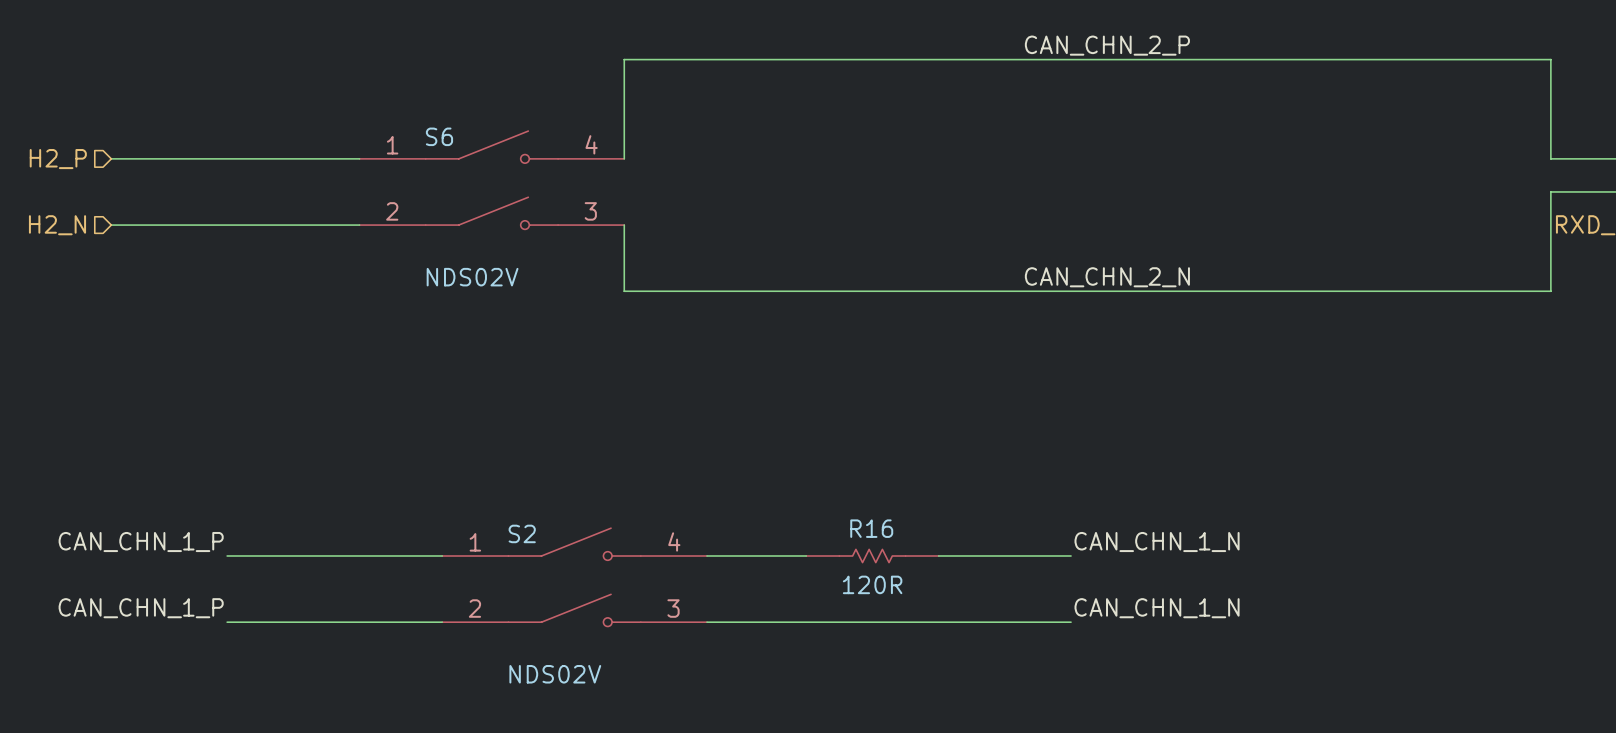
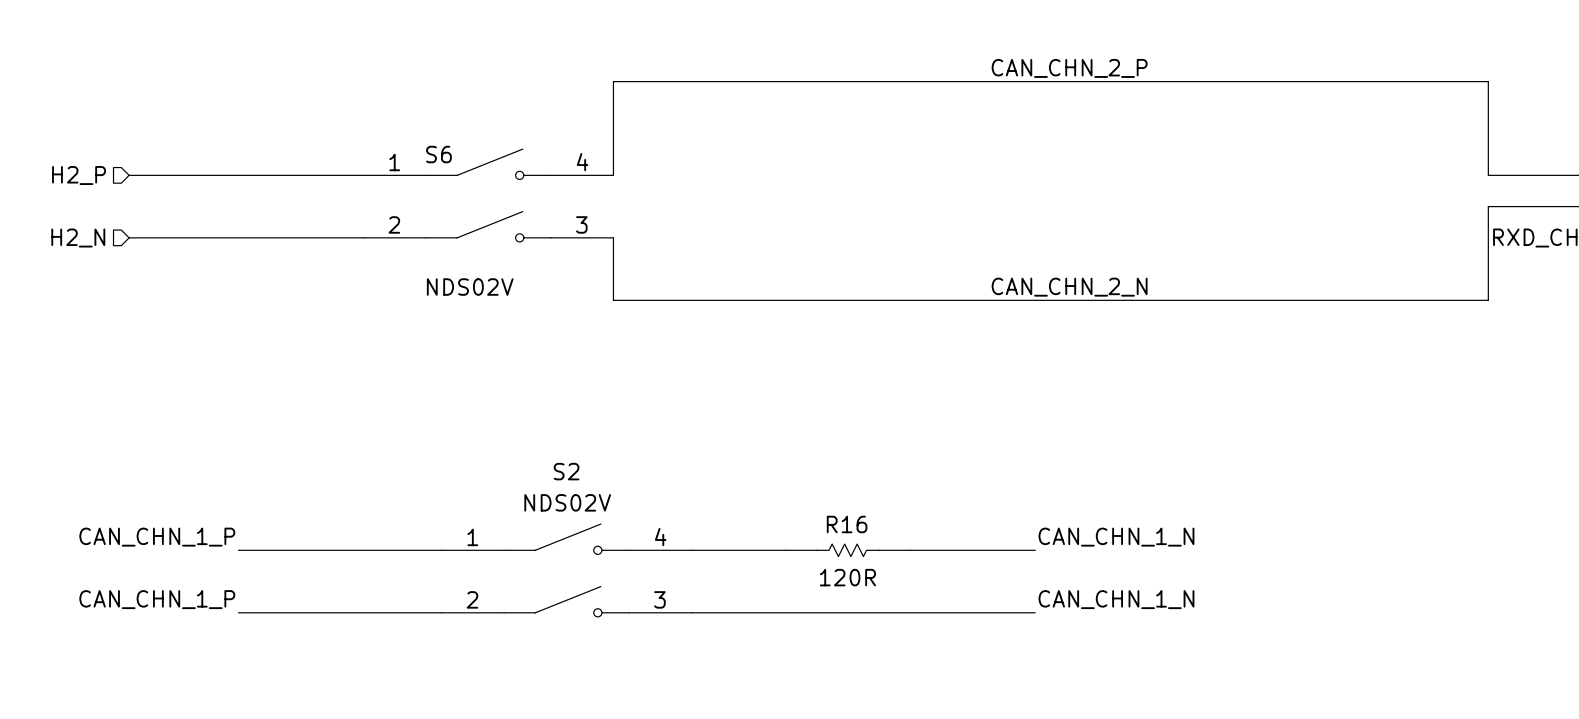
S2 name position: S2 (522, 533) -> S2 (566, 471)
S2 value position: NDS02V (555, 674) -> NDS02V (567, 502)

